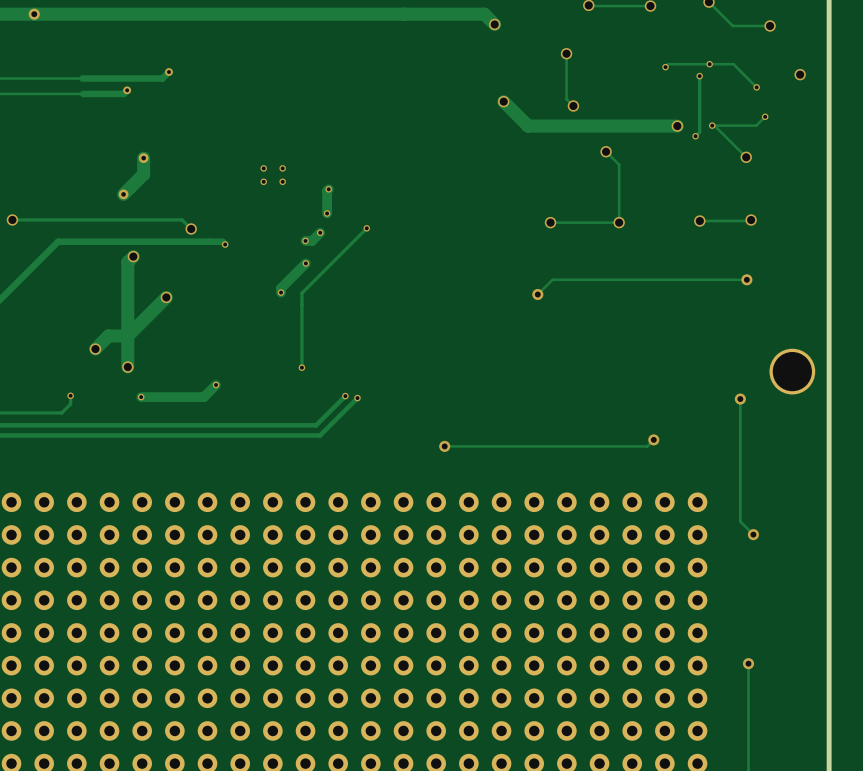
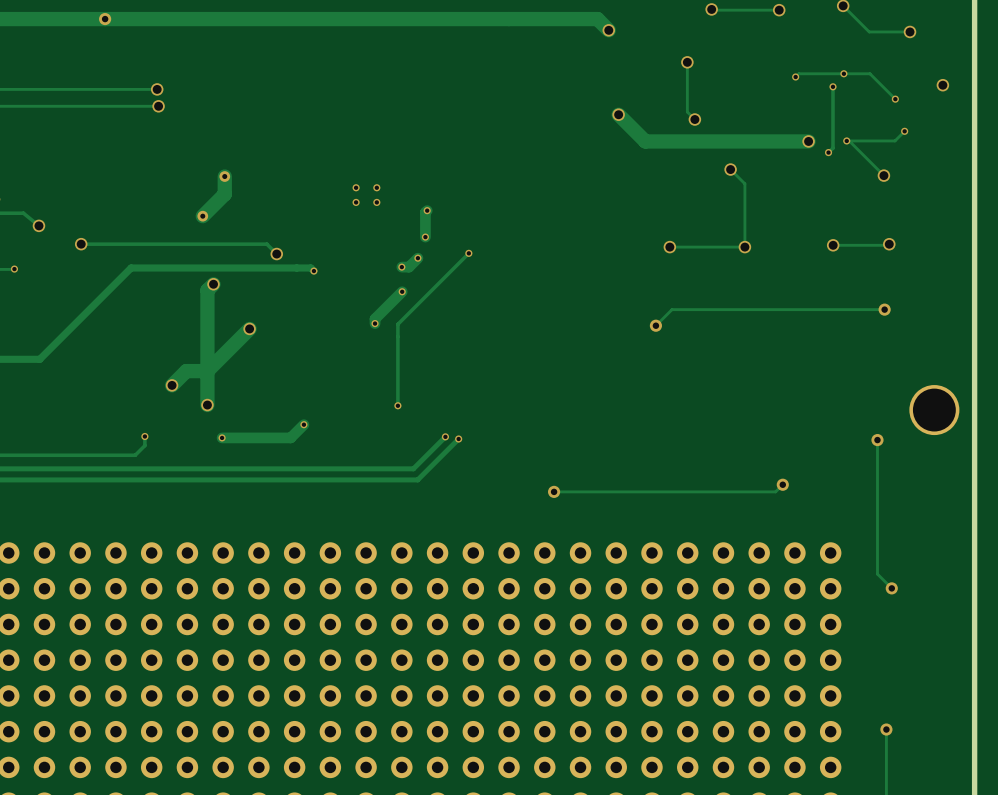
track: (168, 72) (162, 78) (82, 78) -> none
via: (168, 72) -> none
via: none -> (157, 89)
track: (127, 90) (123, 93) (83, 93) -> none
via: (127, 90) -> none
via: none -> (158, 106)

